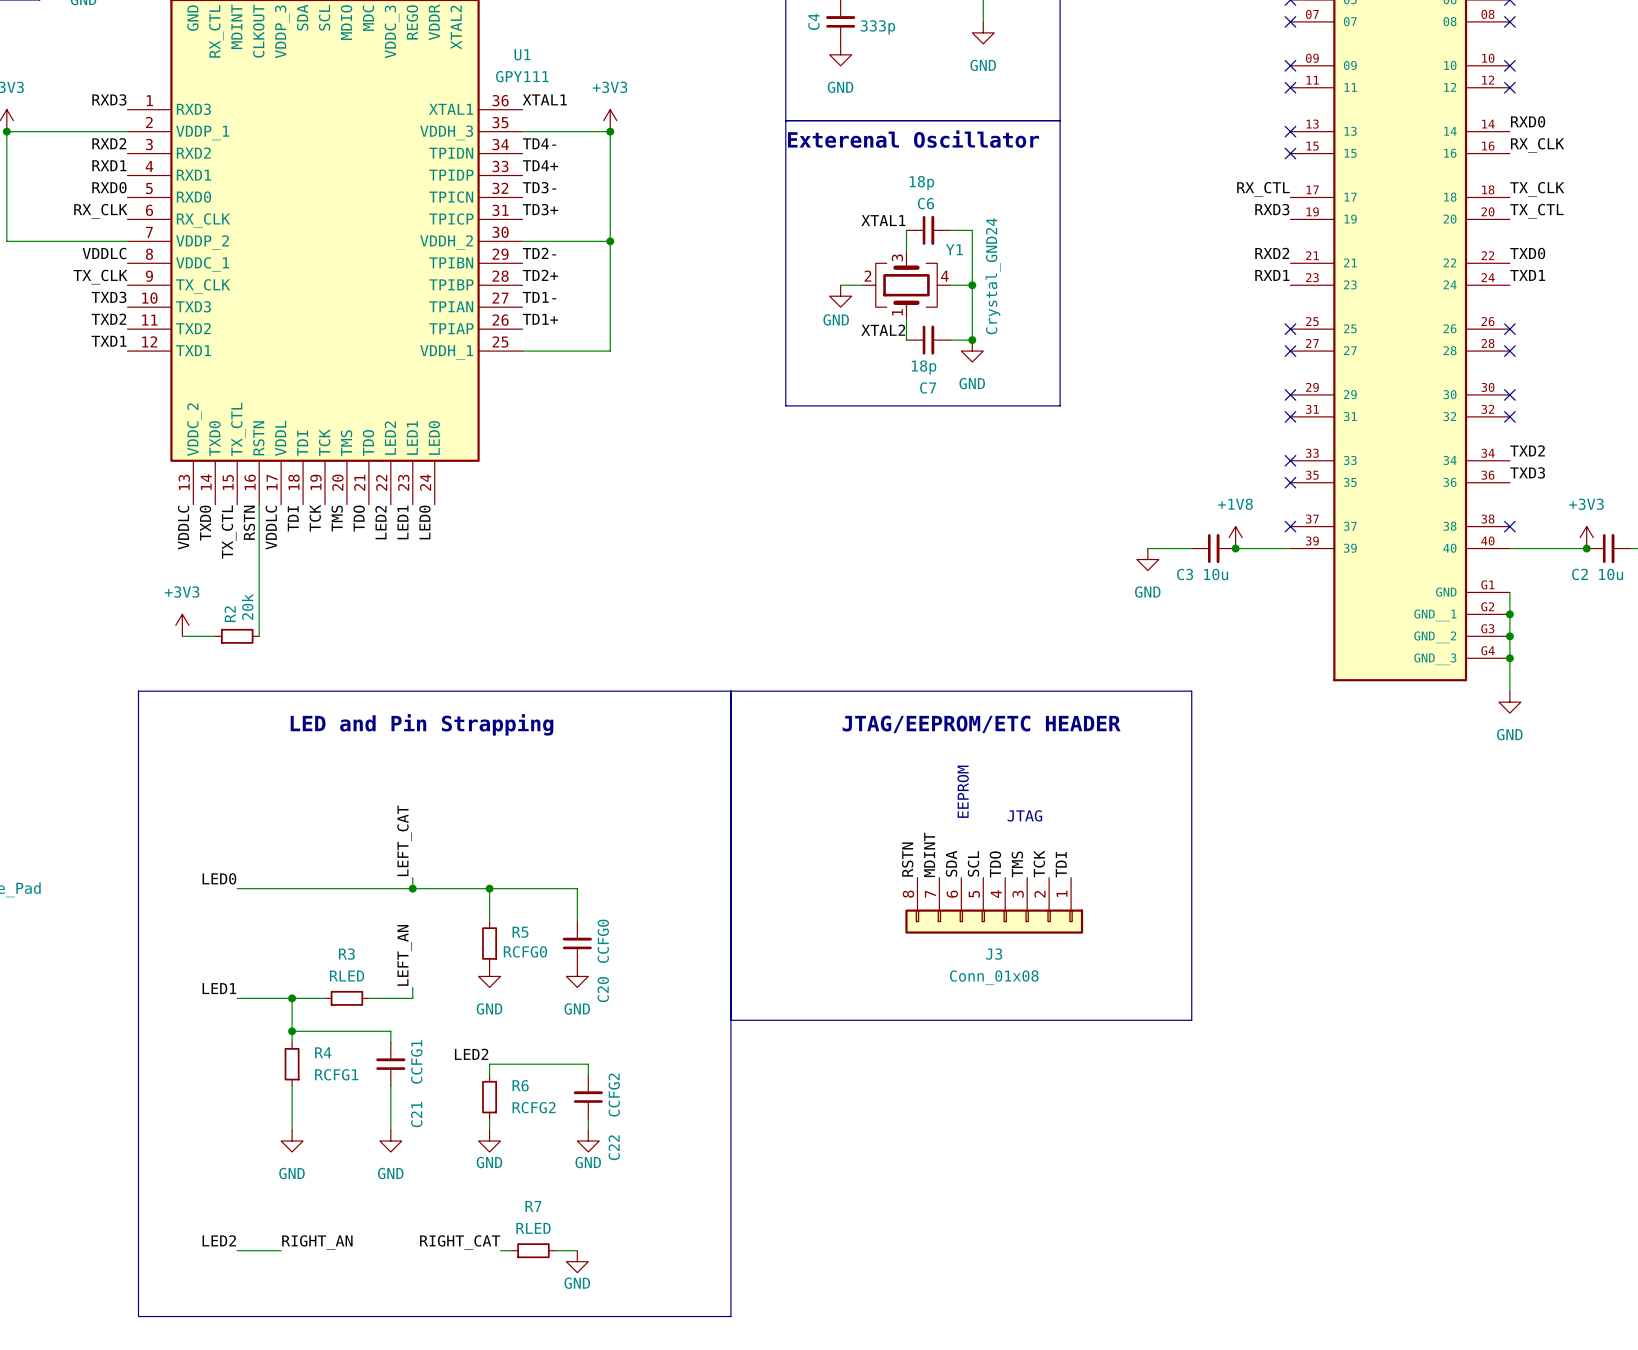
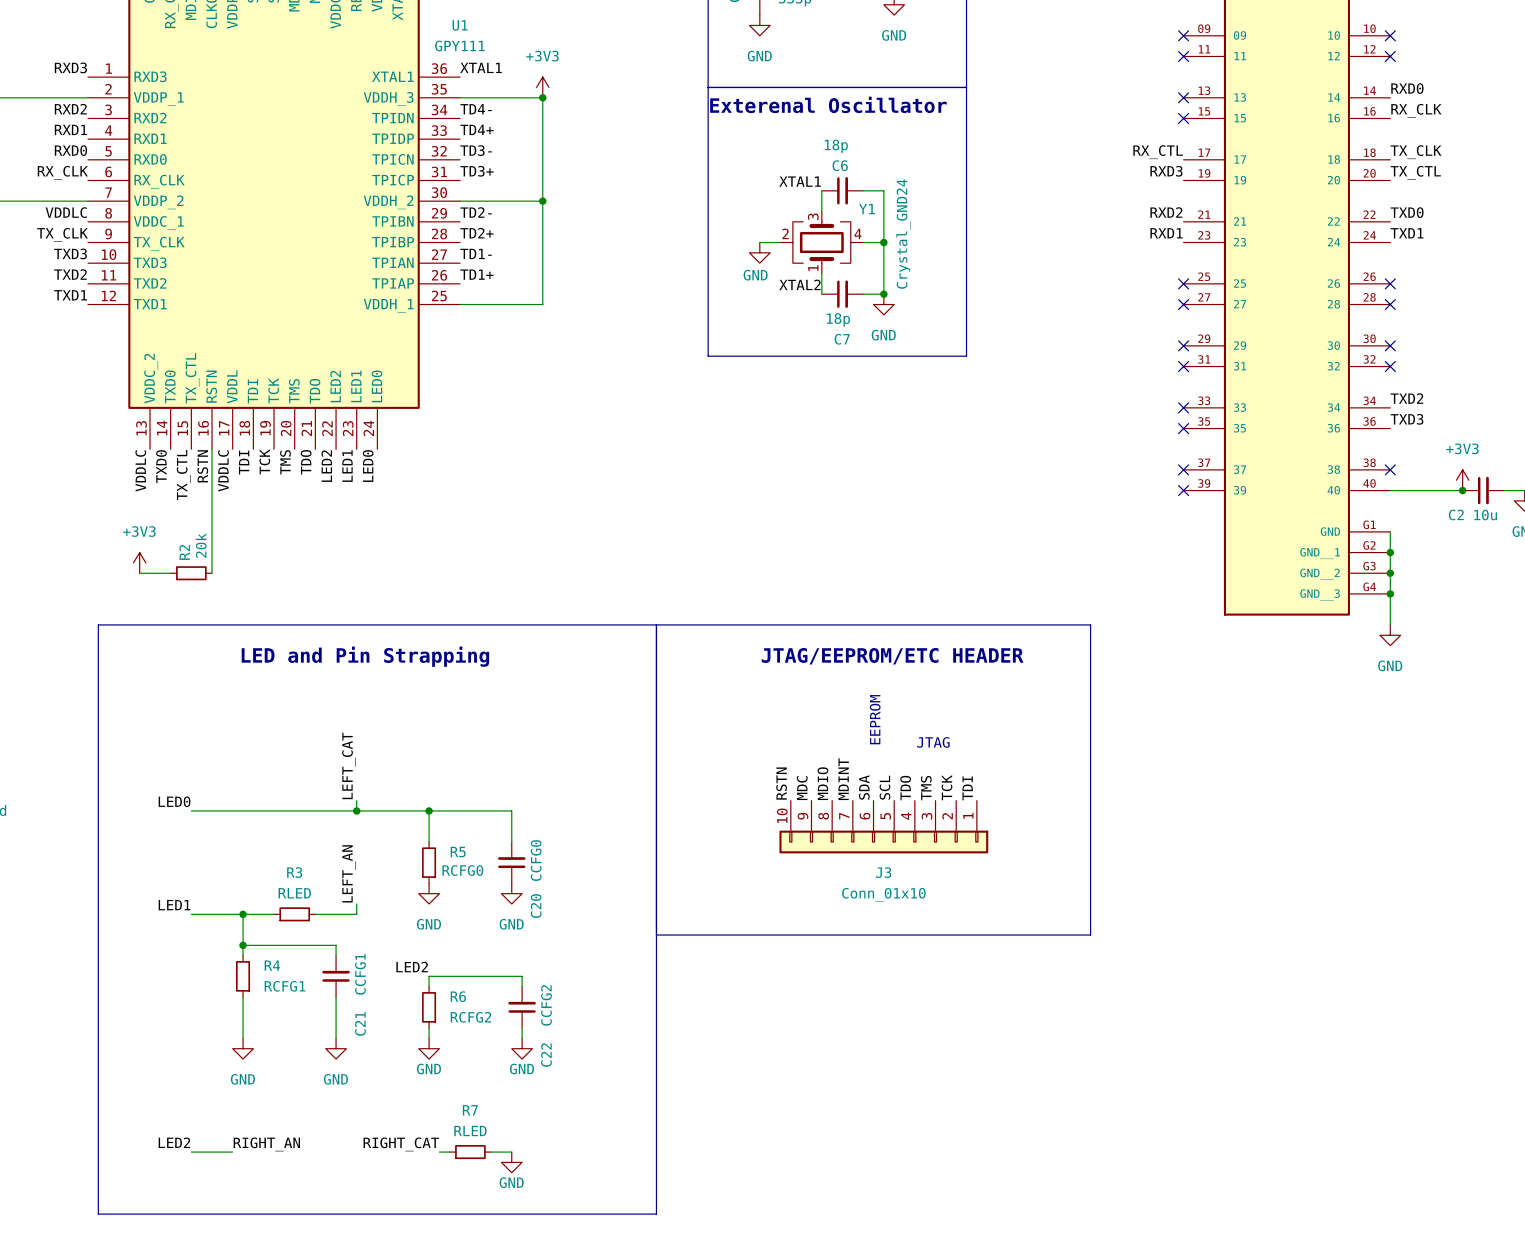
power symbol: +1V8 (1235, 537) -> none
wire: (1147, 548) (1191, 548) -> none
C3: 10u (1213, 548) -> none
wire: (1235, 548) (1290, 548) -> none
junction: (1235, 548) -> none
no-connect mark: none -> (1183, 490)
power symbol: GND (1147, 559) -> none
label: none -> RSTN (781, 783)
label: RSTN (907, 859) -> MDIO (822, 783)
label: none -> MDC (802, 788)
J3 symbol: [905, 877, 1084, 934] -> [779, 800, 989, 854]
J3 value: Conn_01x08 (994, 977) -> Conn_01x10 (883, 894)

